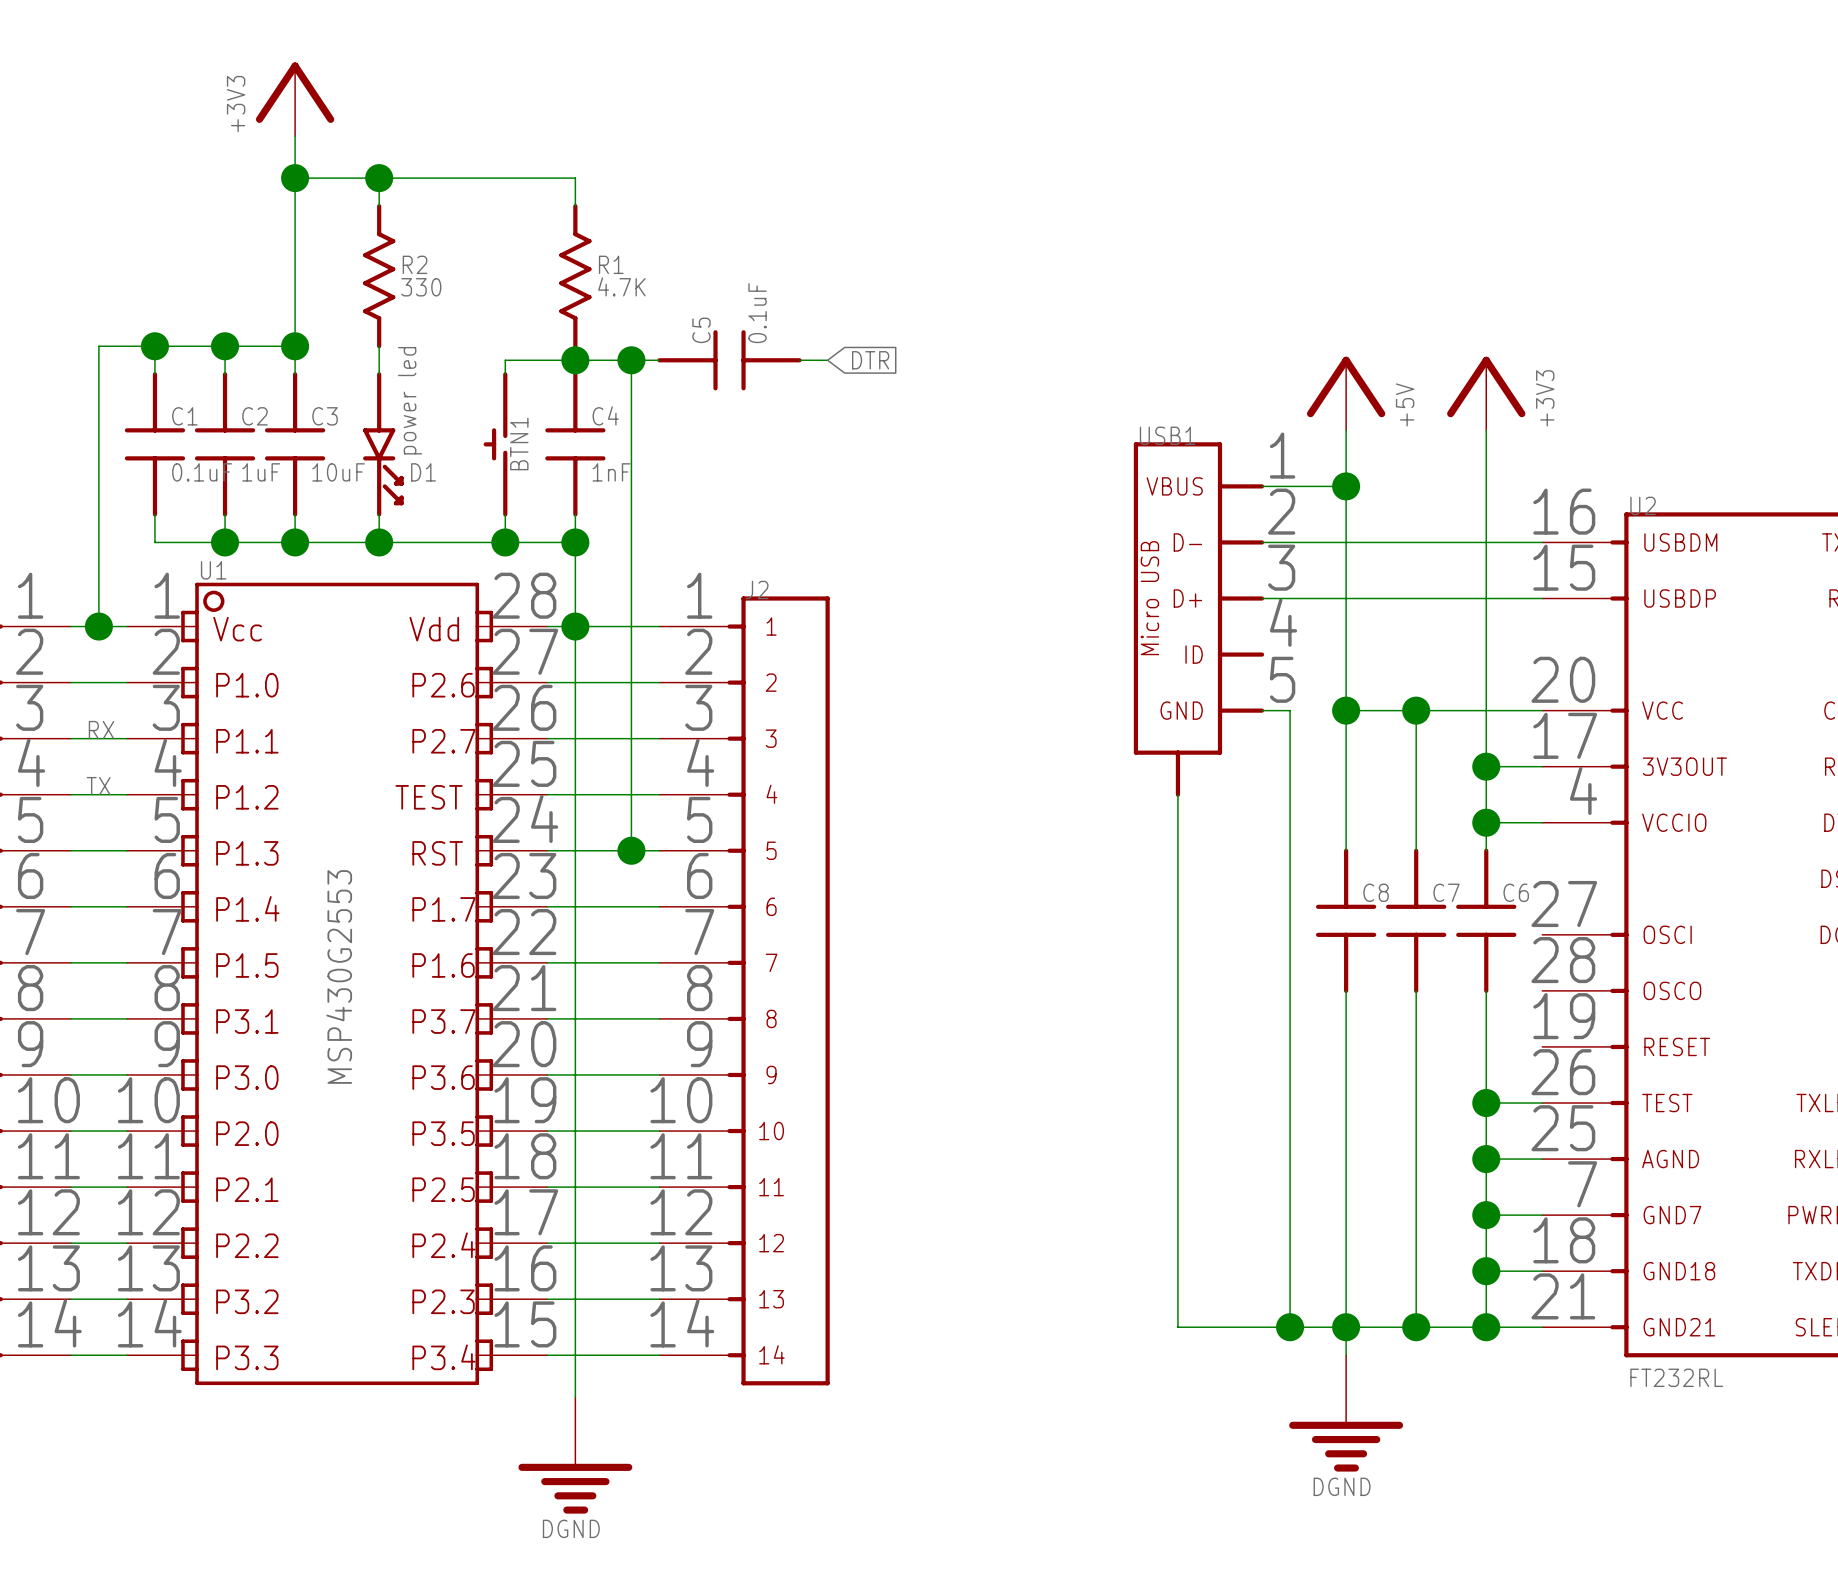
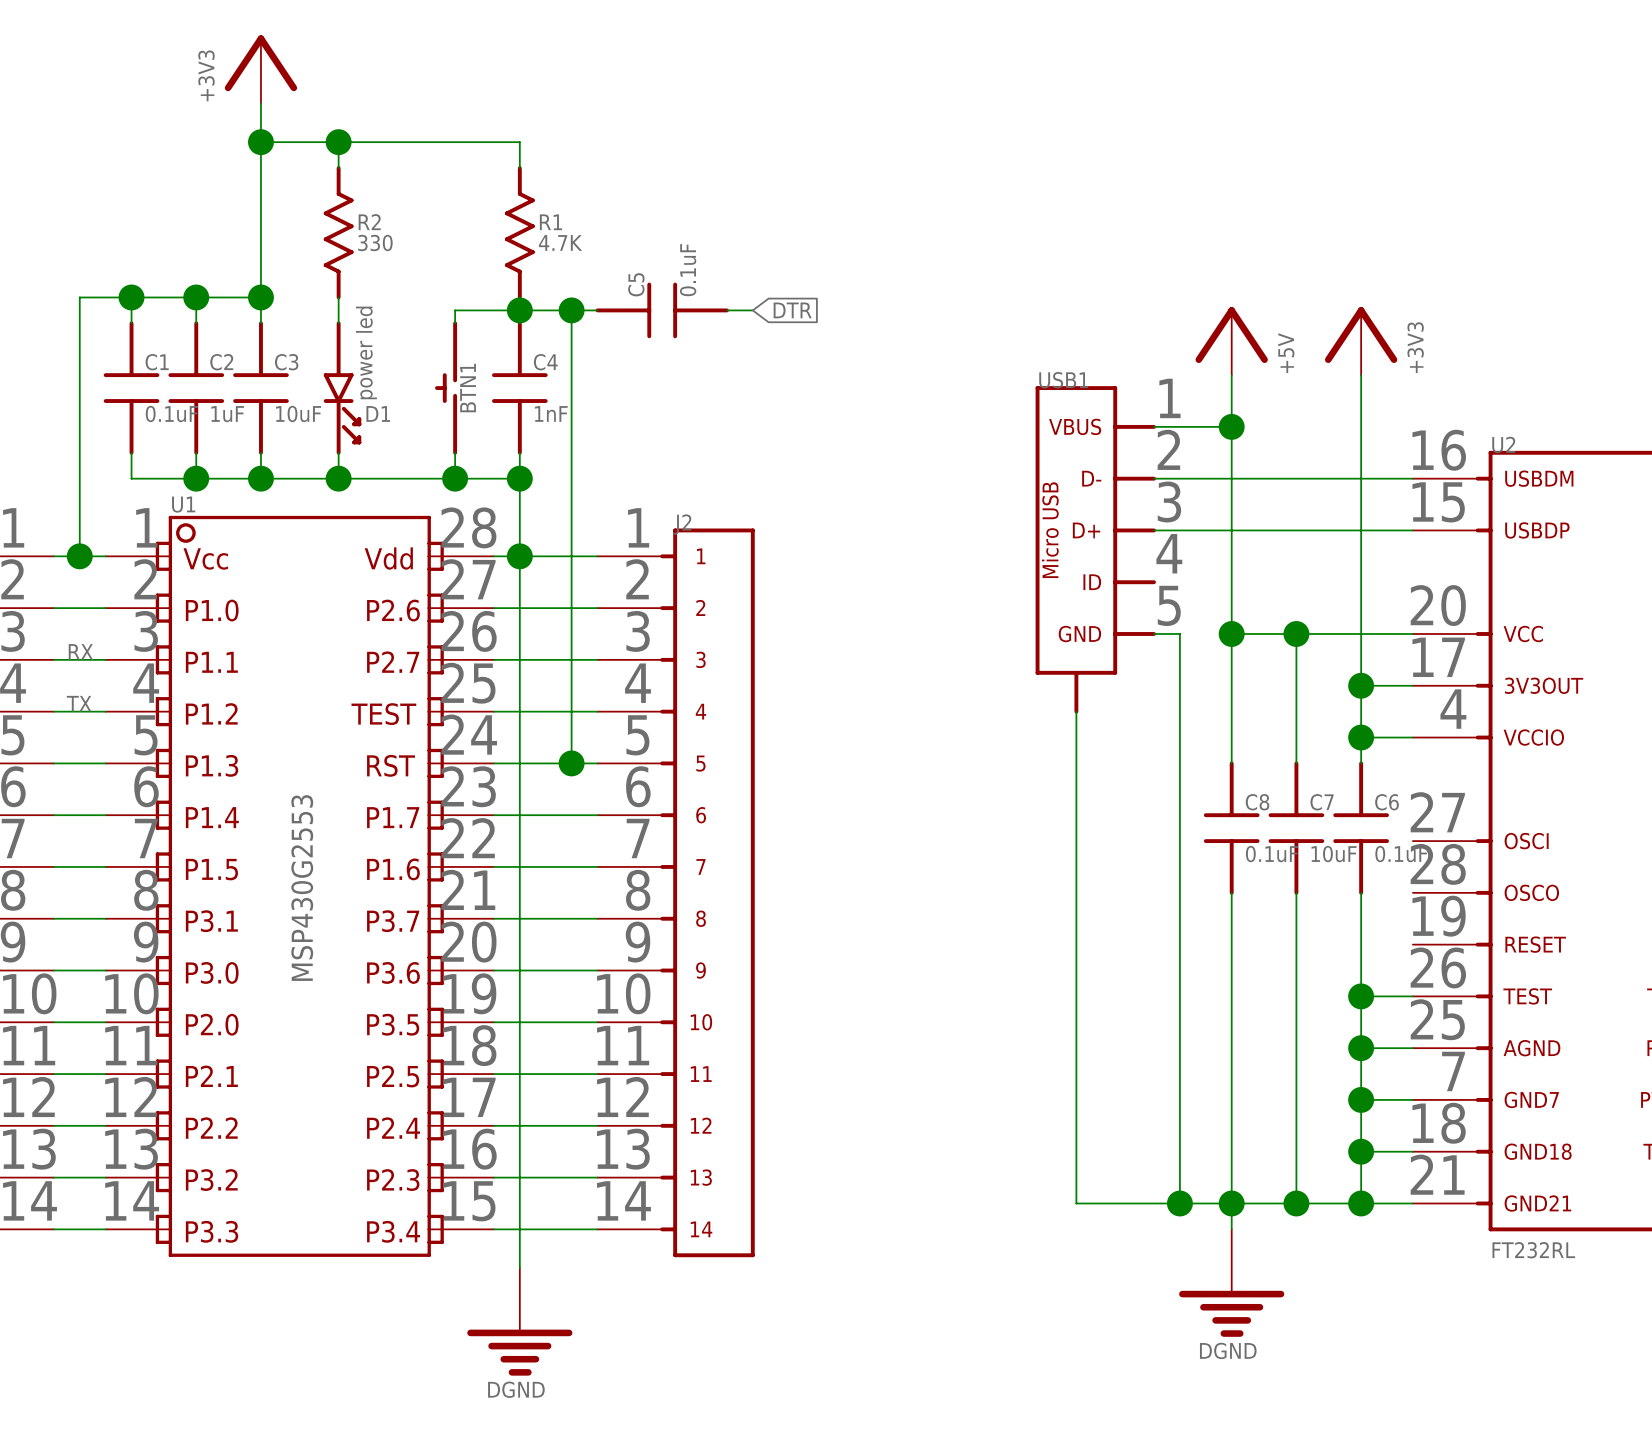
C8 value: none -> 0.1uF (1271, 854)
C7 value: none -> 10uF (1334, 854)
C6 value: none -> 0.1uF (1401, 854)

